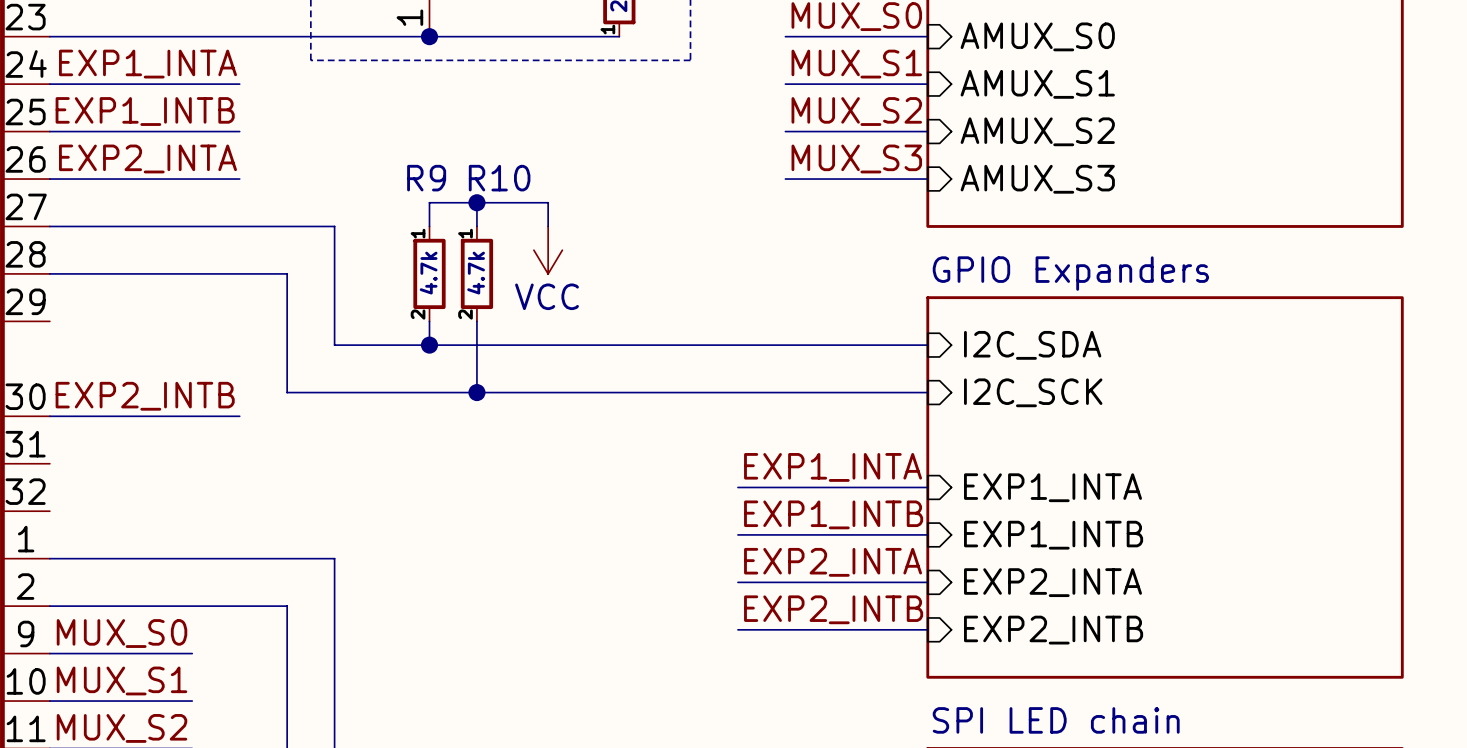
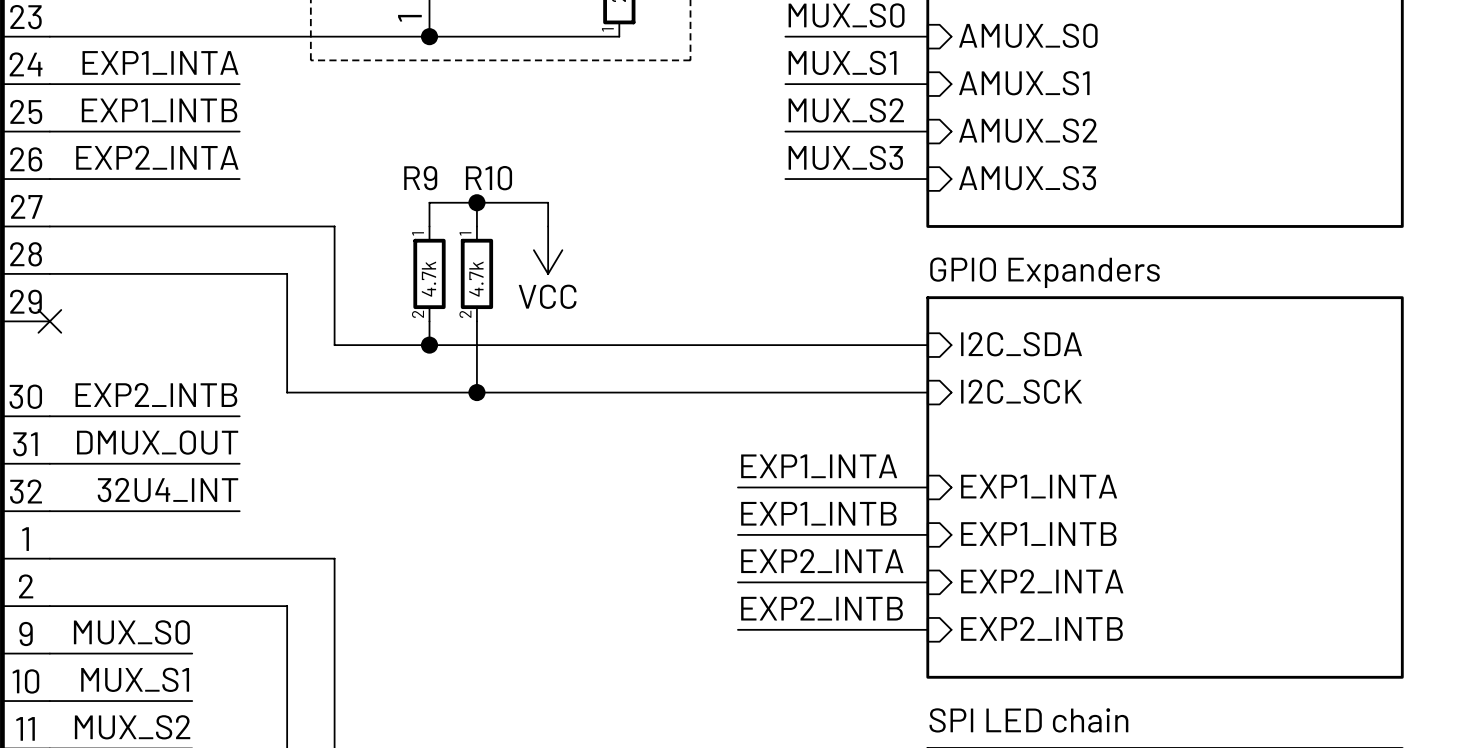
no-connect mark: none -> (49, 321)
label: none -> DMUX_OUT (157, 442)
wire: none -> (49, 463) (239, 463)
label: none -> 32U4_INT (167, 490)
wire: none -> (49, 511) (239, 511)

